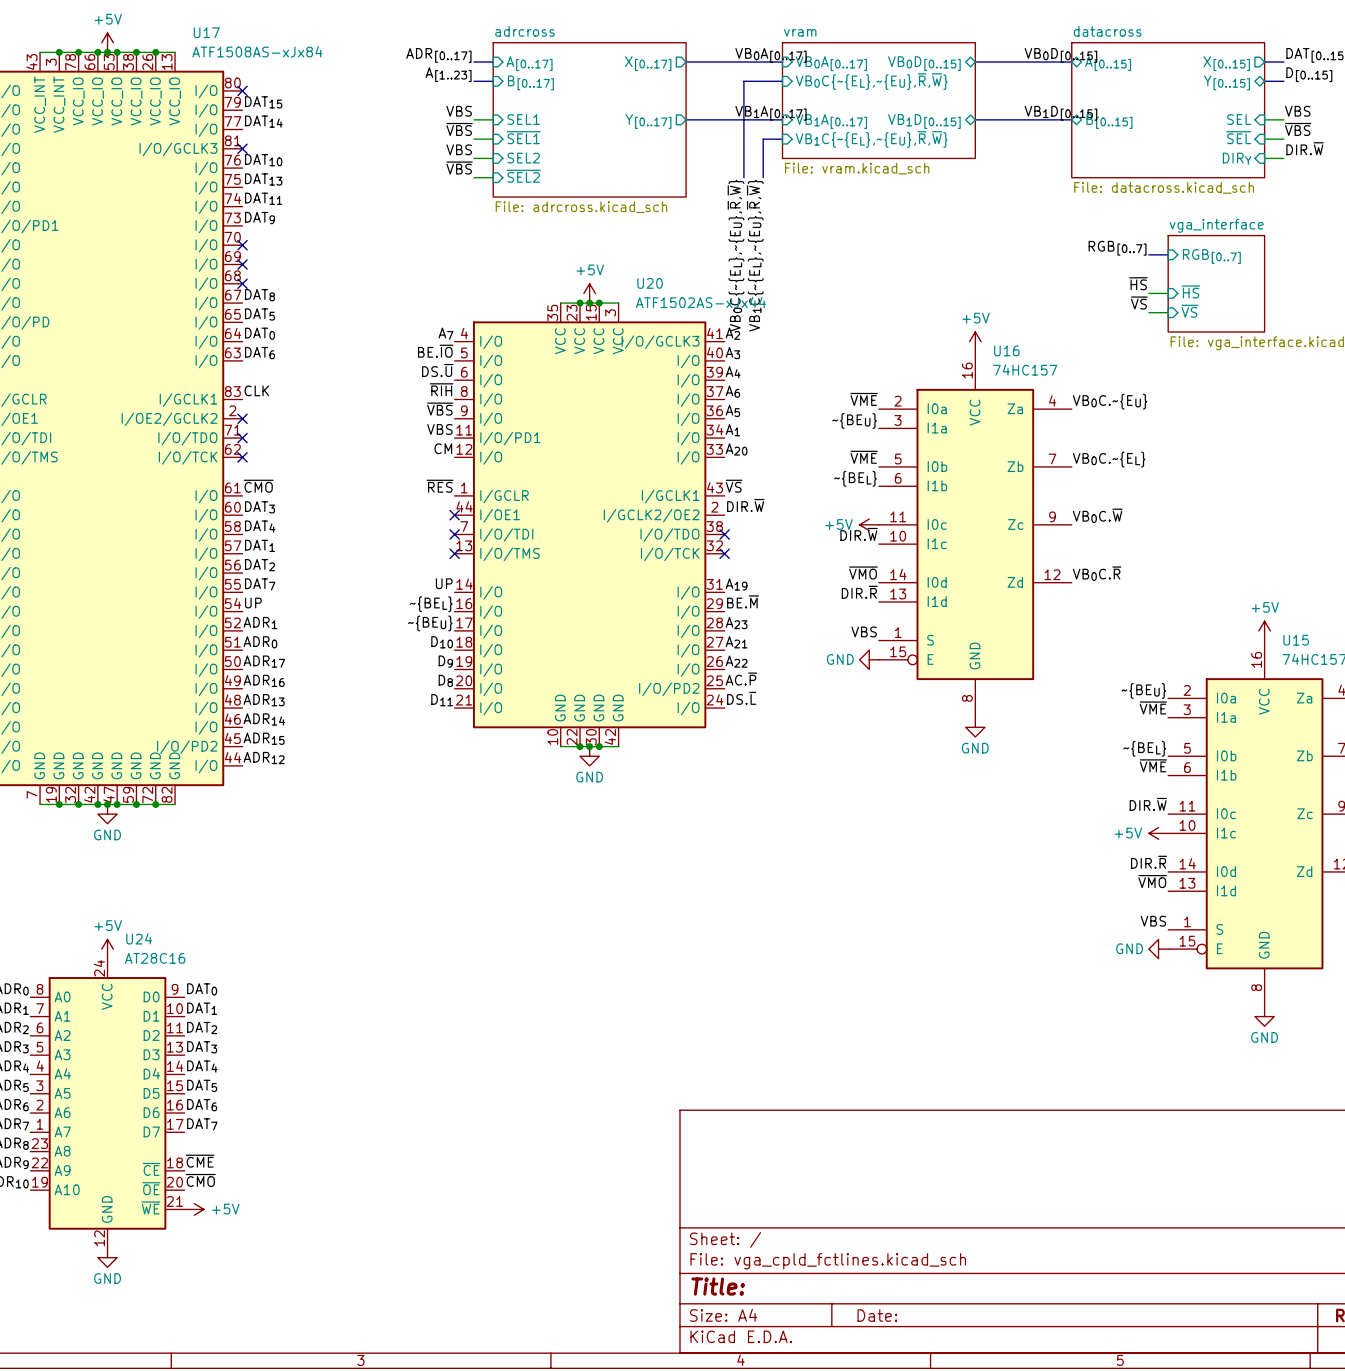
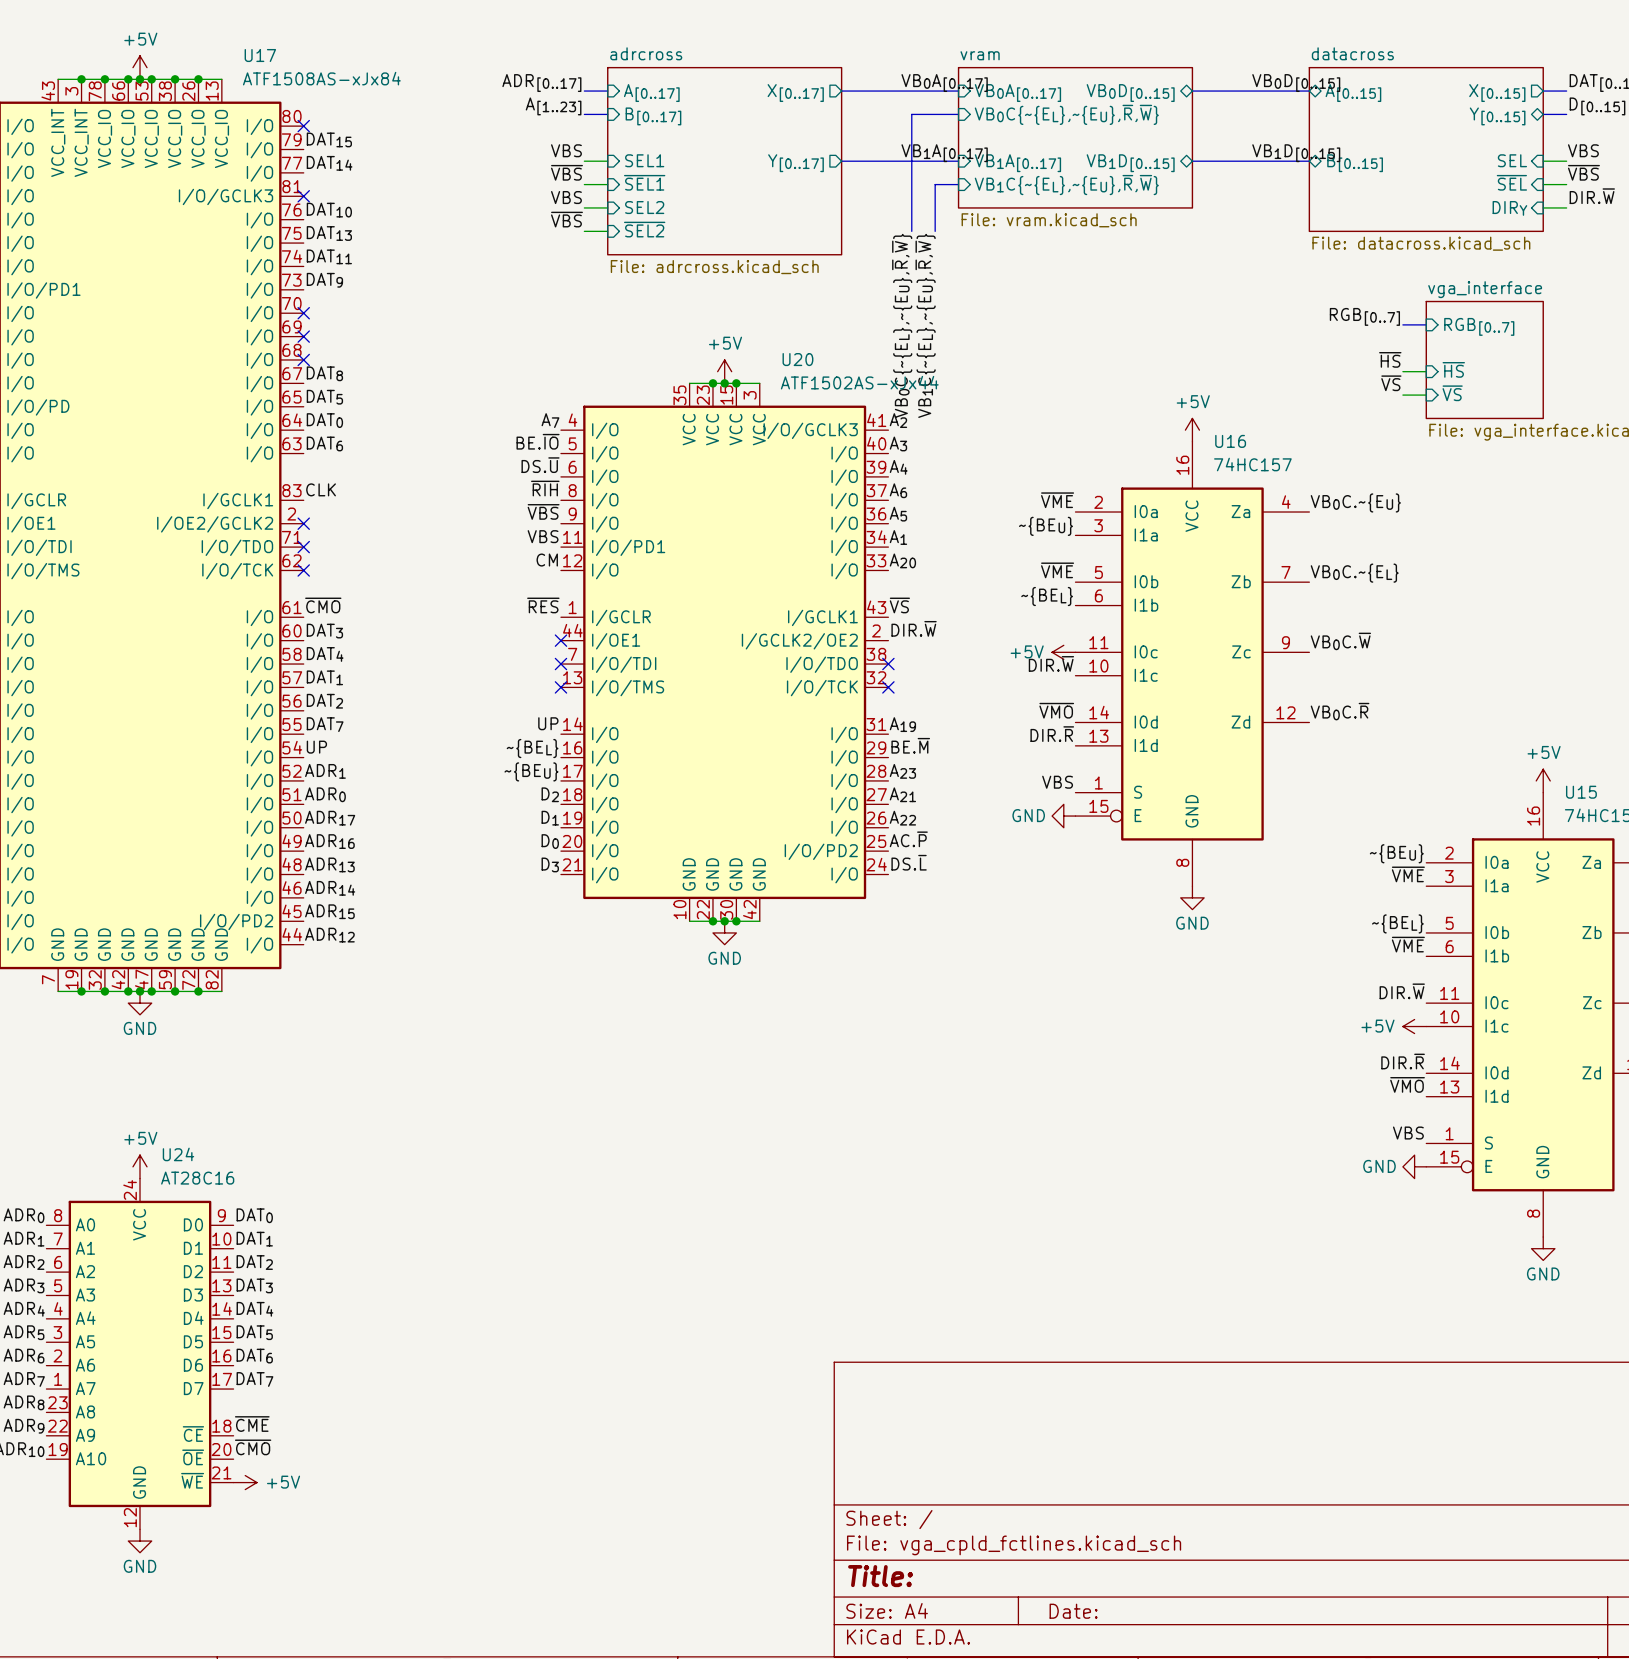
label: D10 (442, 642) -> D2 (550, 794)
label: D9 (445, 661) -> D1 (550, 818)
label: D8 (445, 680) -> D0 (550, 841)
label: D11 (442, 700) -> D3 (550, 864)

